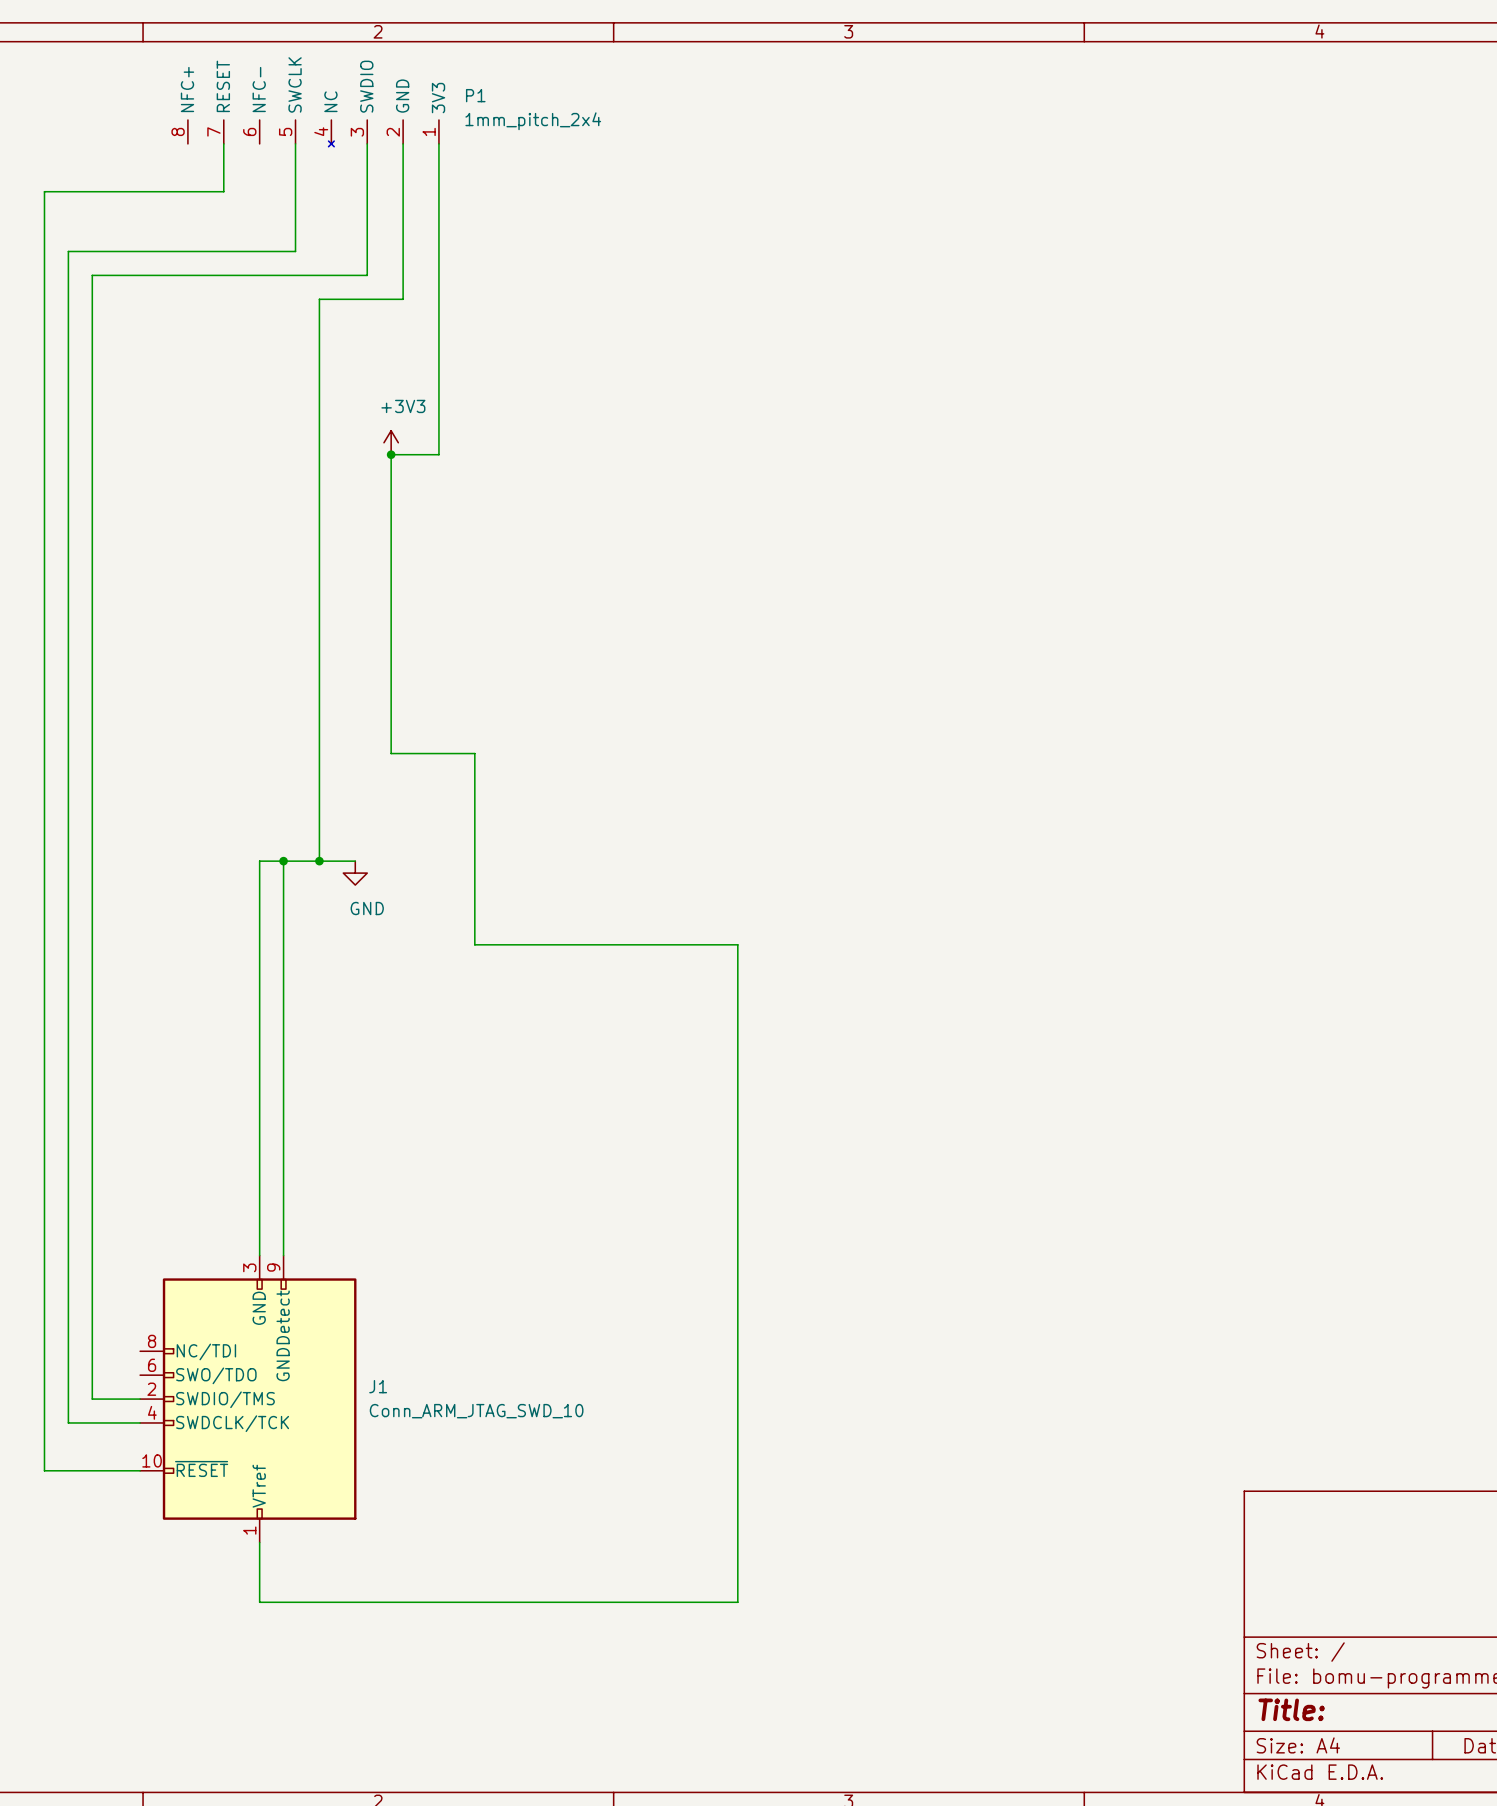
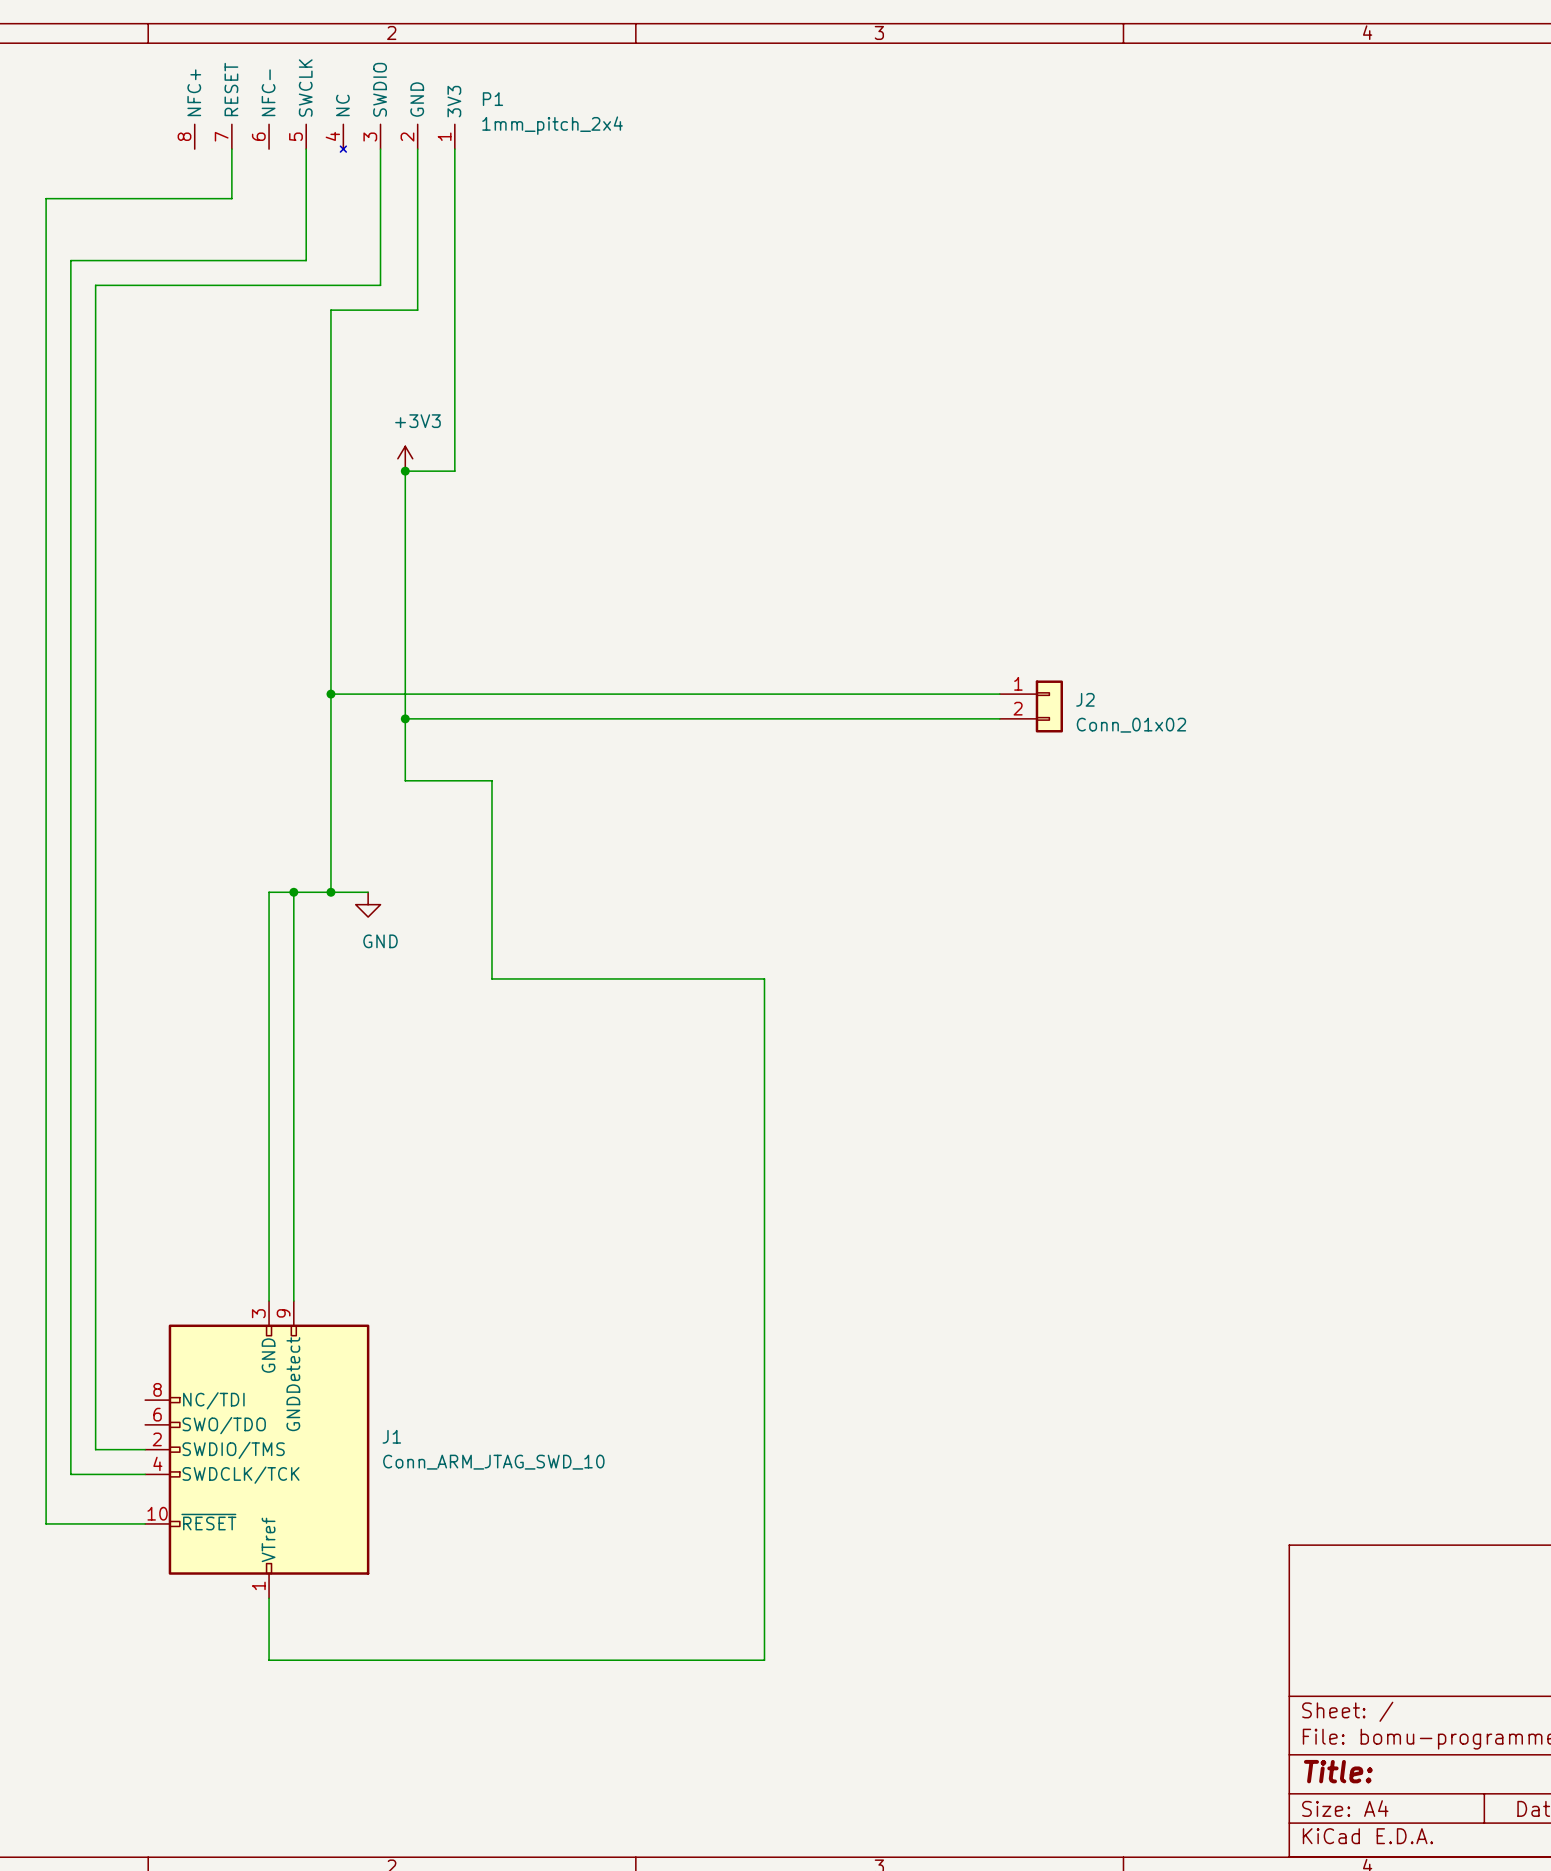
wire: none -> (330, 694) (999, 694)
junction: none -> (330, 694)
J2: none -> Conn_01x02 (1031, 706)
wire: none -> (405, 718) (999, 718)
junction: none -> (405, 718)

